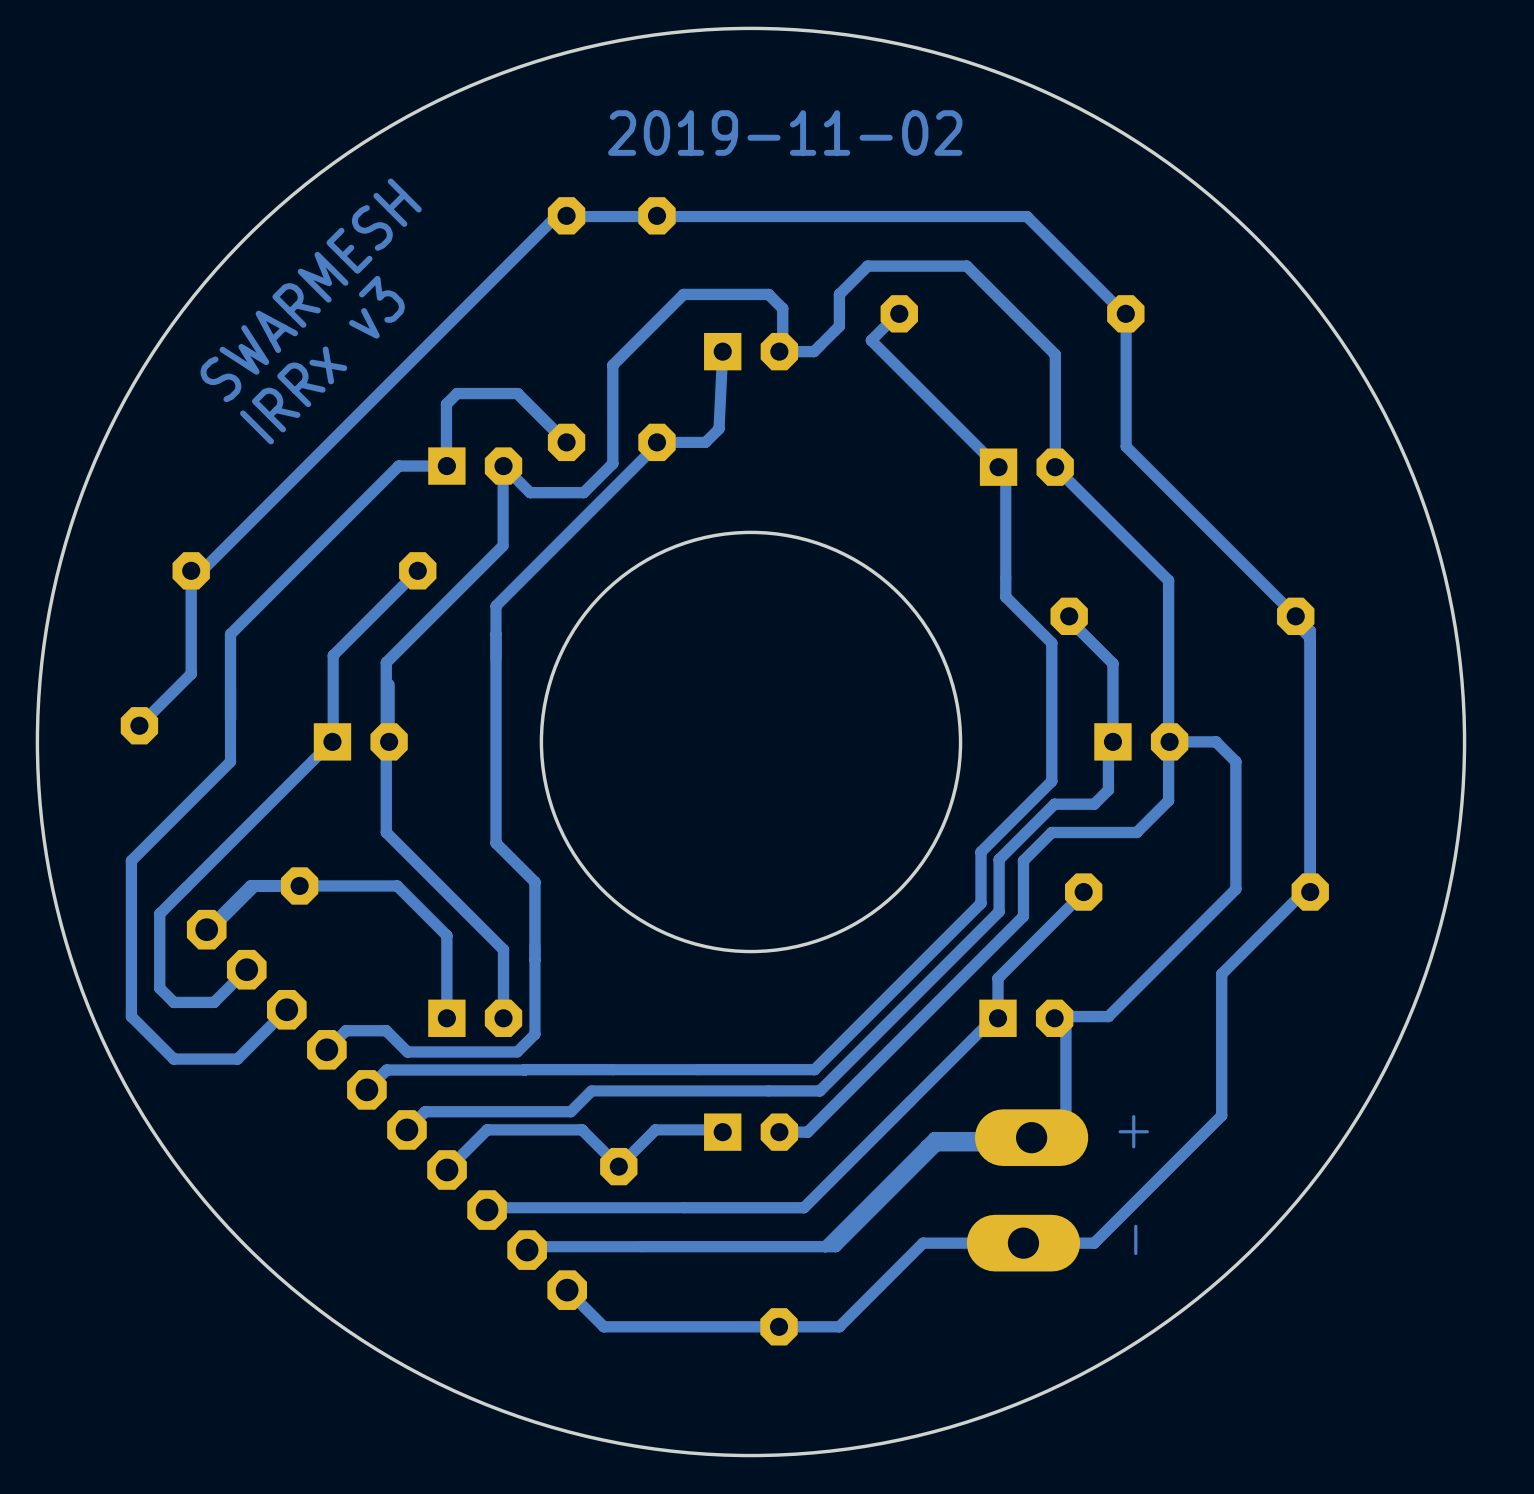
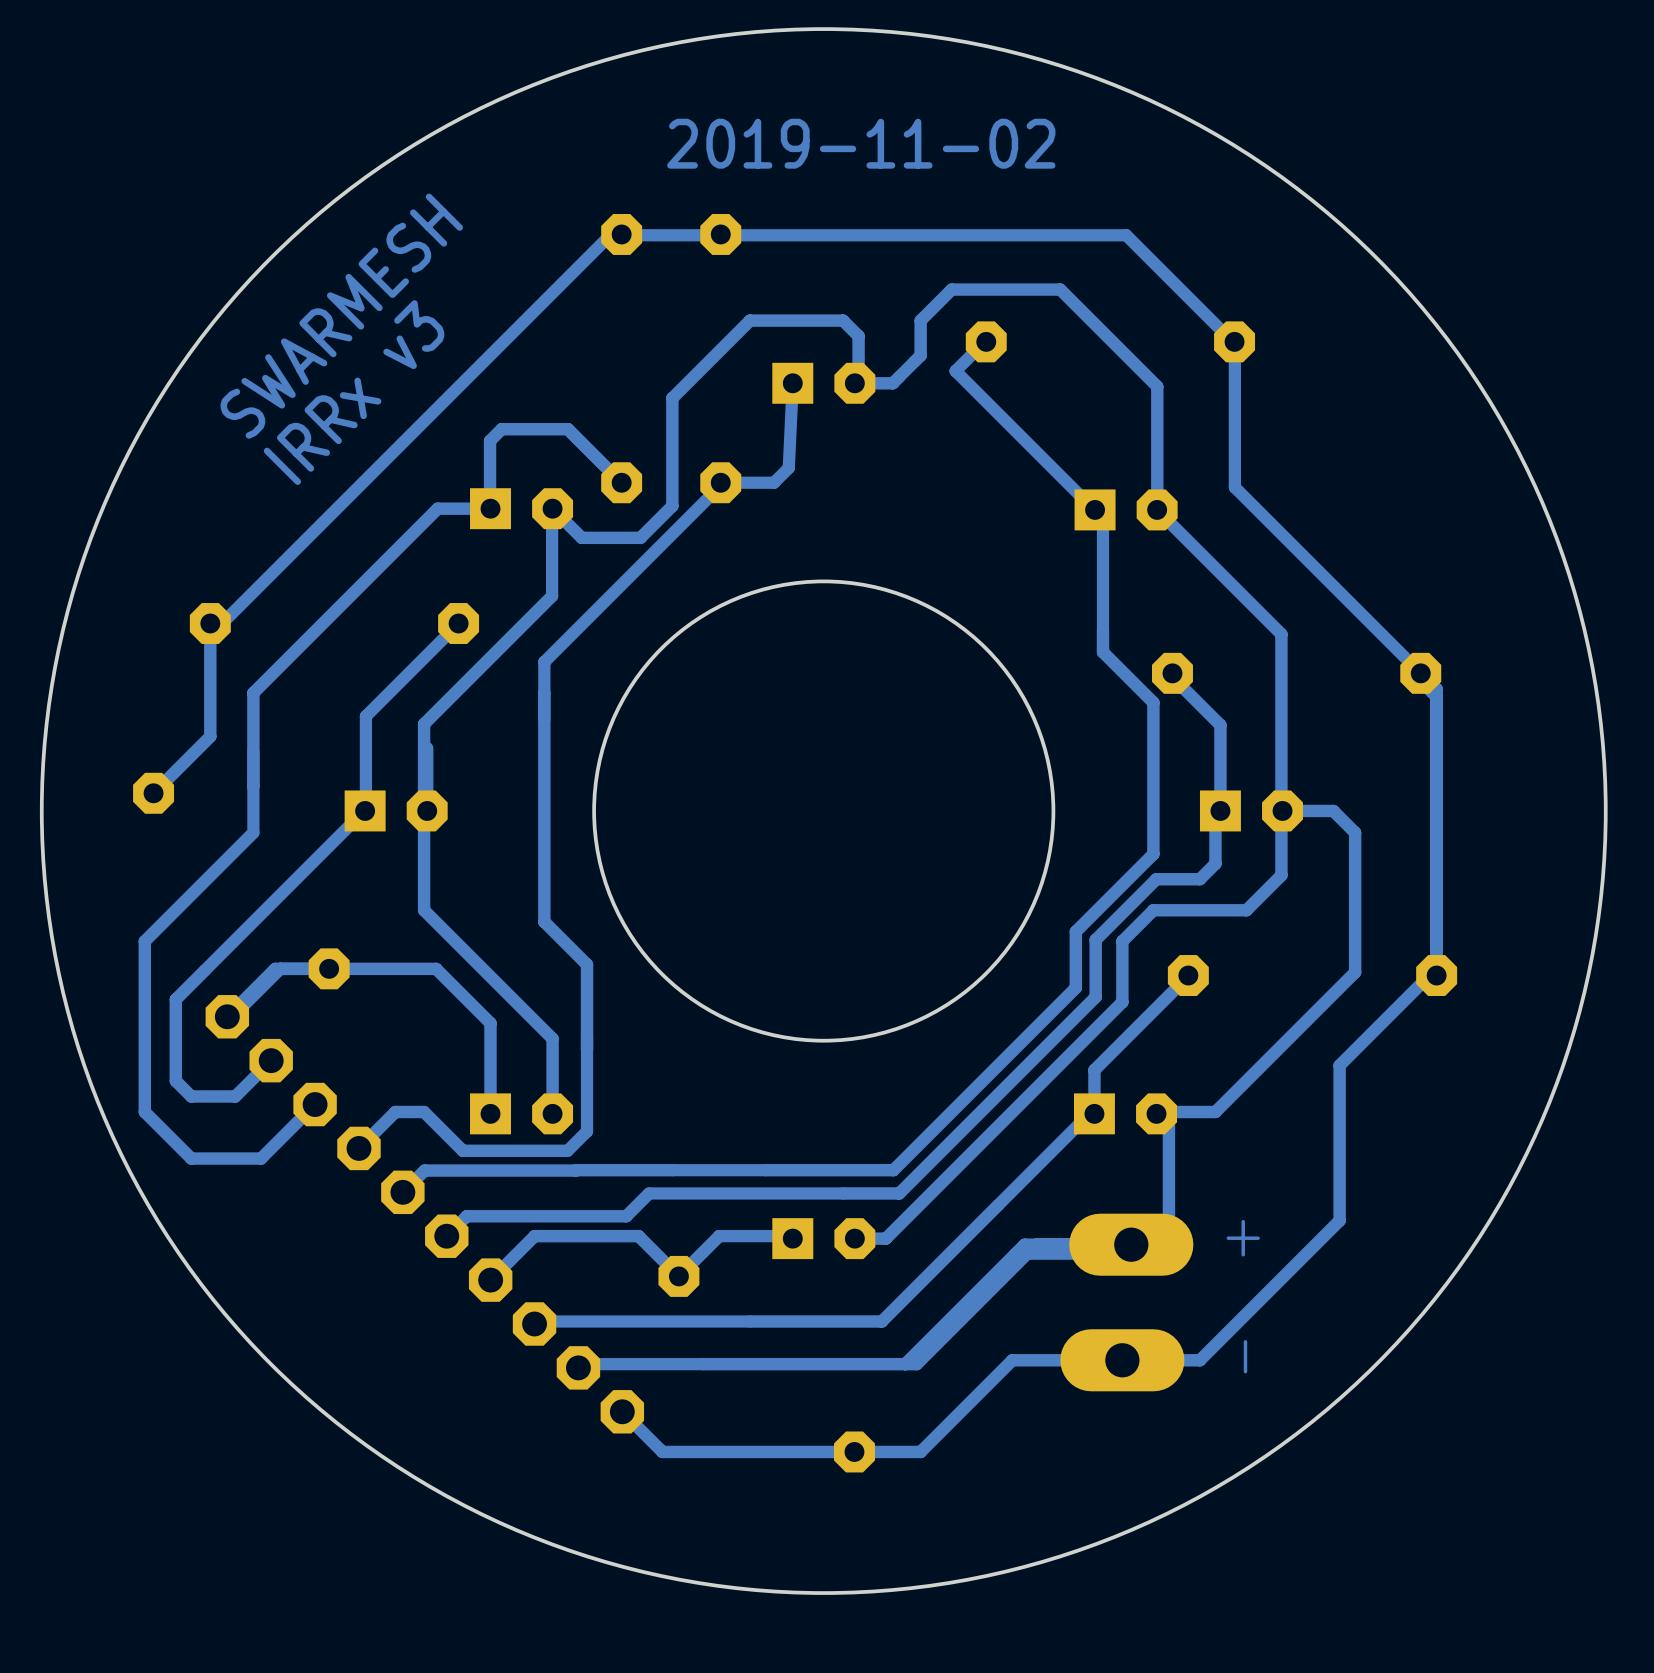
bottom track: (345, 1030) (386, 1030) (407, 1051) (421, 1051) -> (379, 1127) (395, 1112) (424, 1112) (462, 1150)

